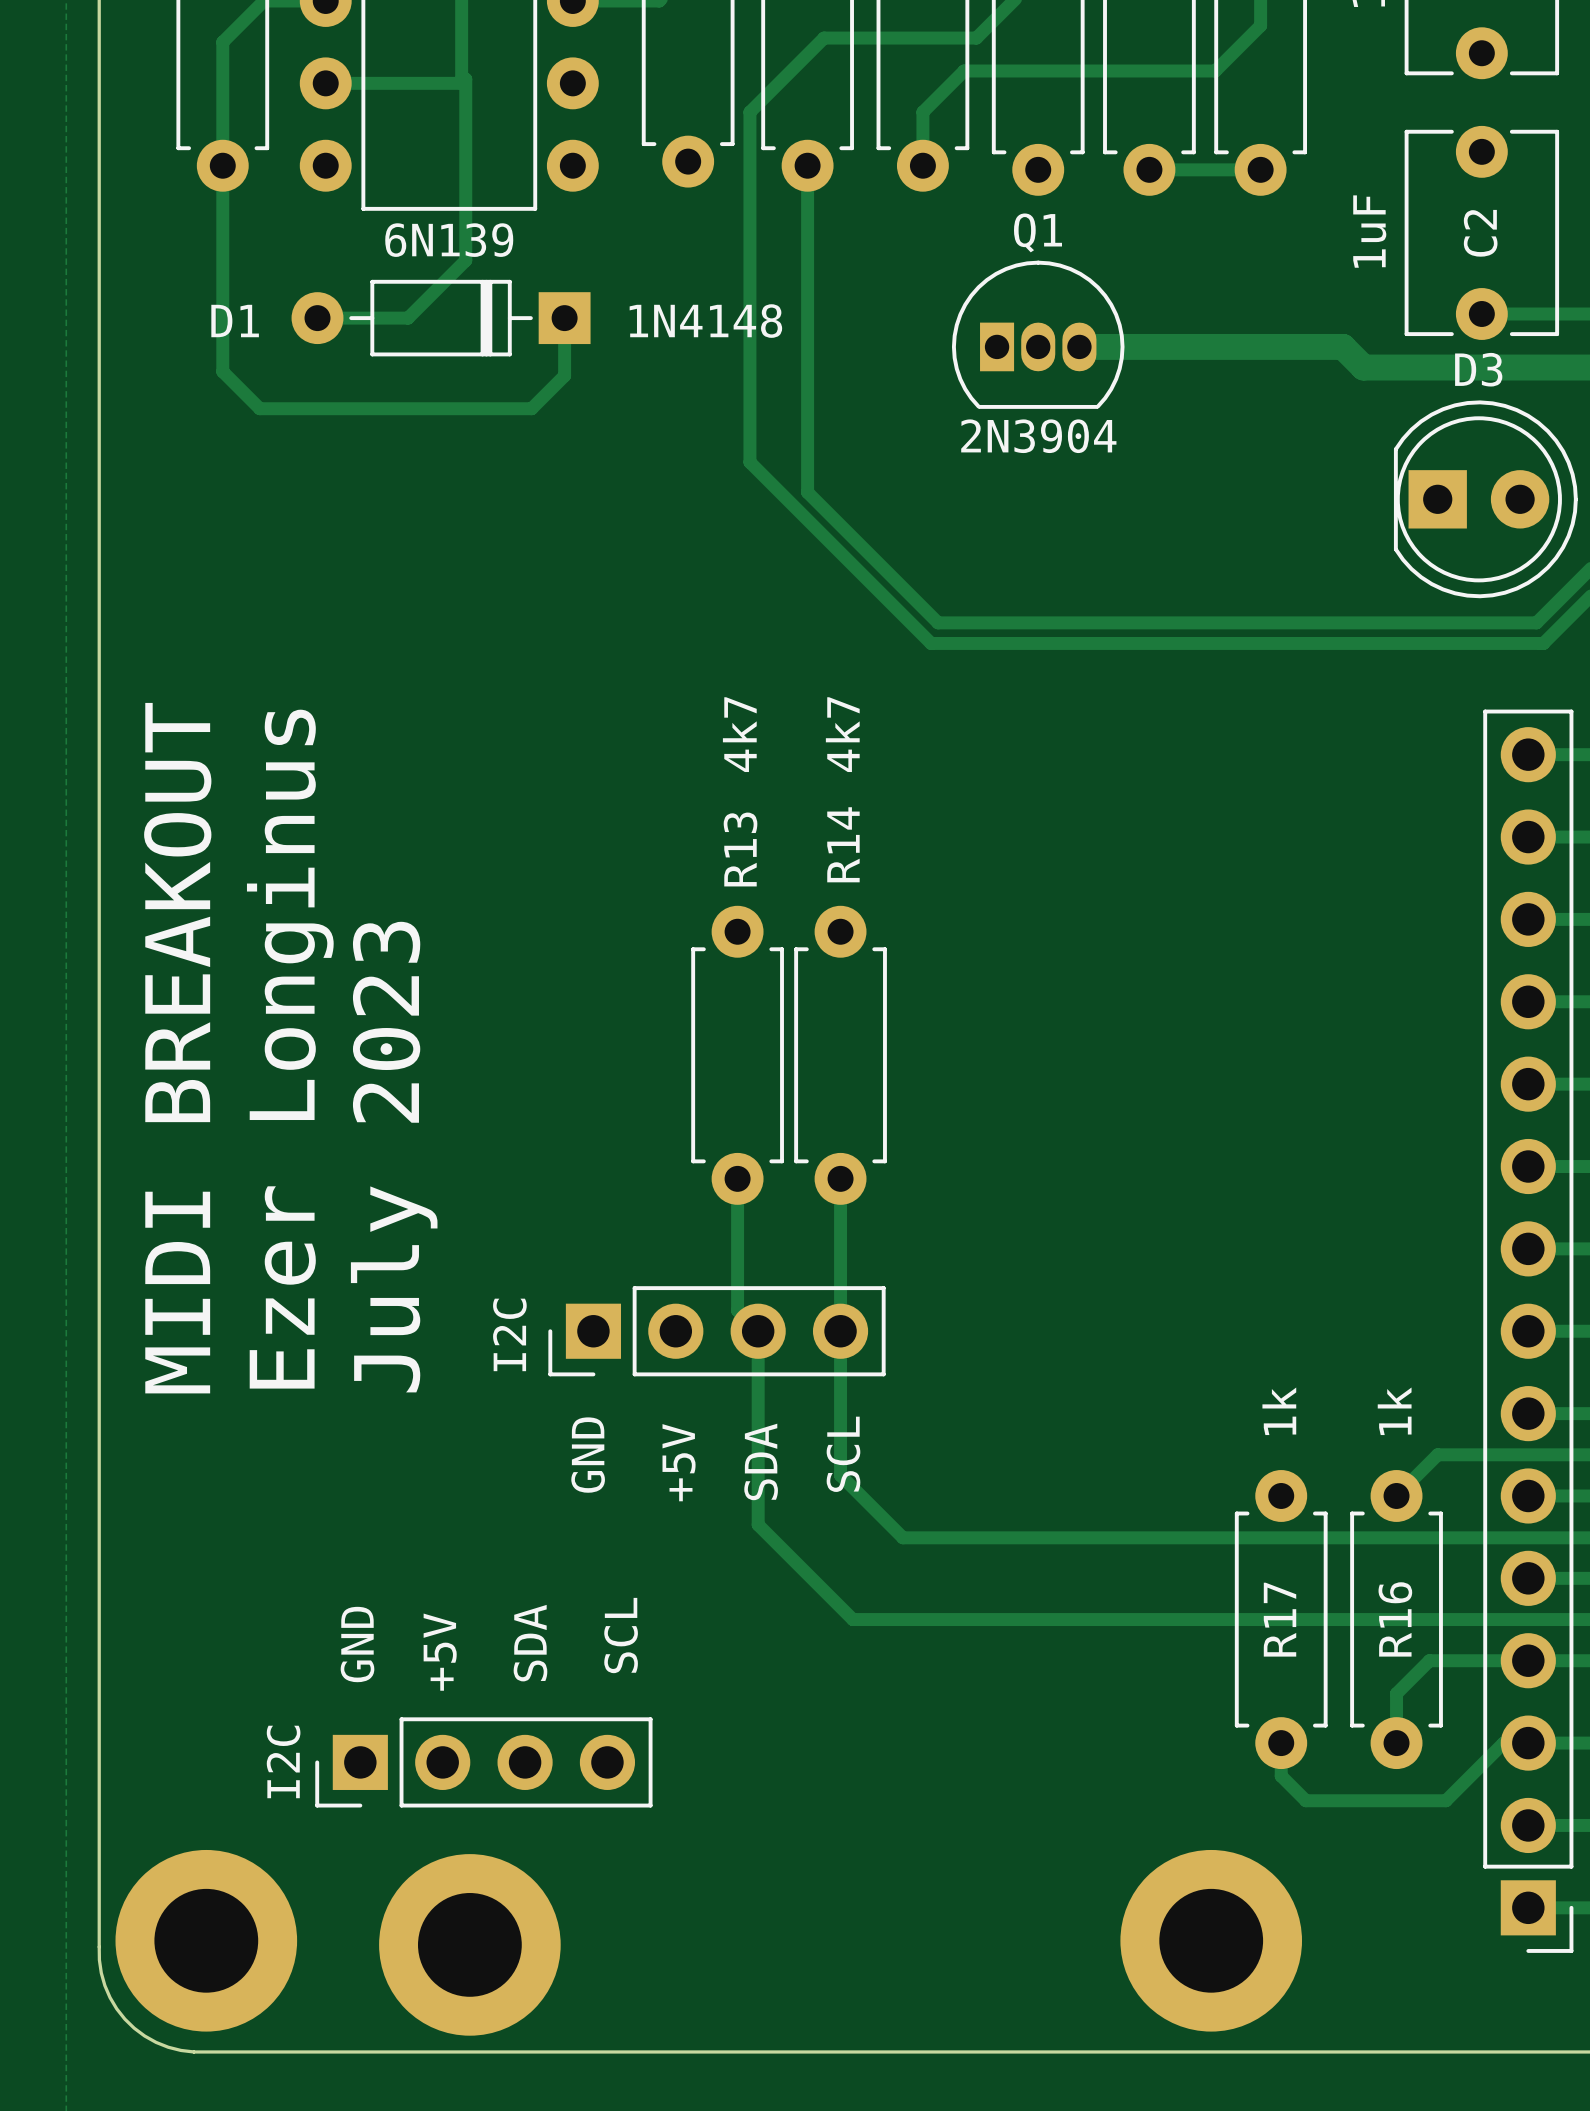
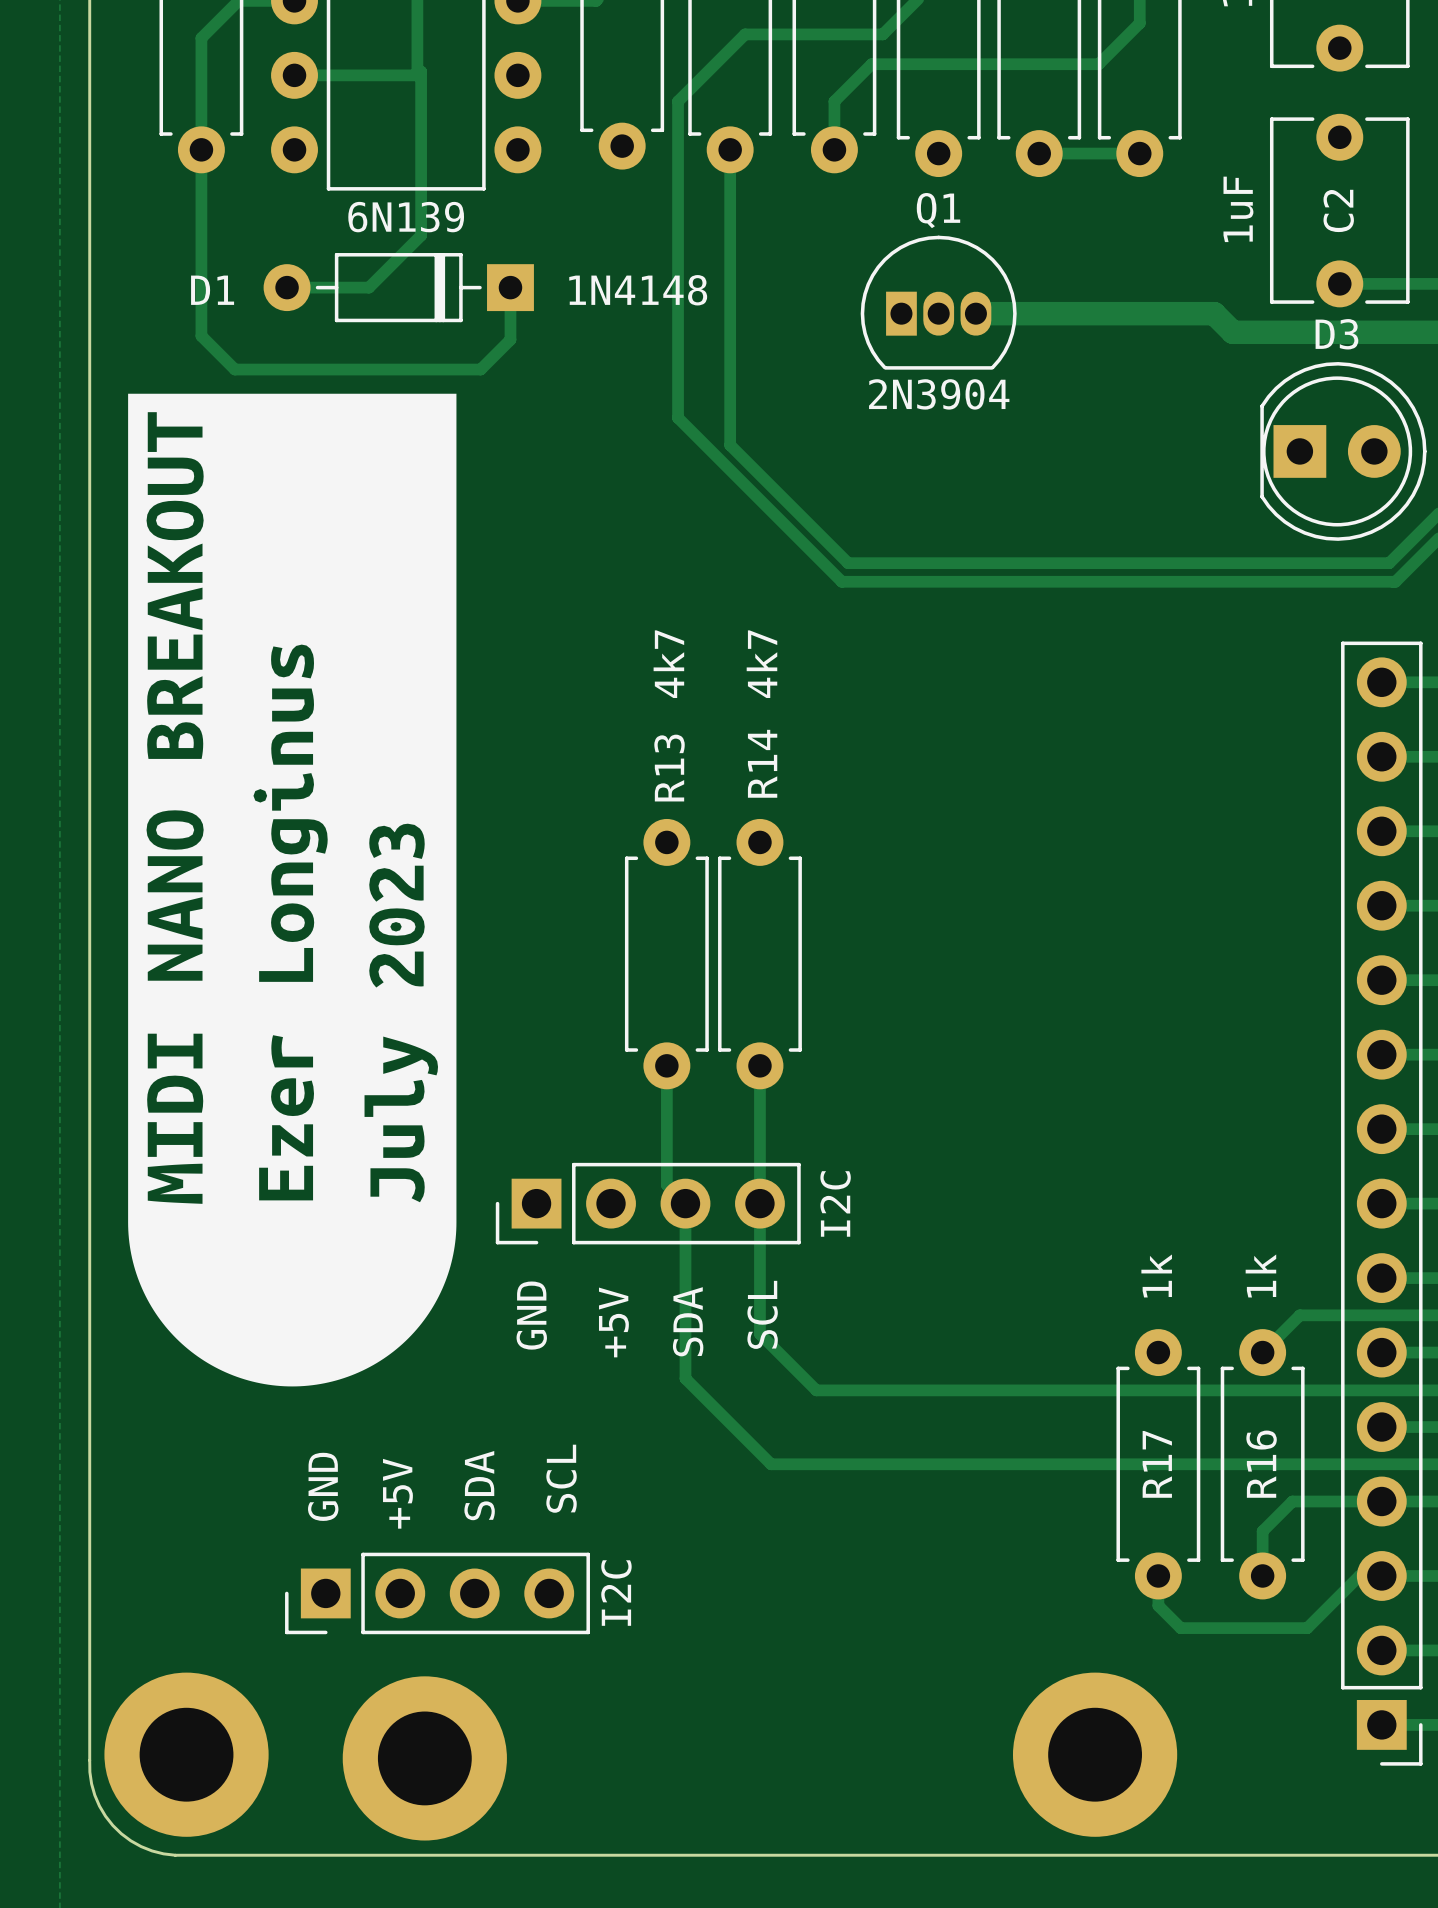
drawing: none -> [128, 393, 457, 1387]
text: MIDI BREAKOUT (177, 1048) -> none
text: Ezer Longinus (290, 1049) -> none
text: July 2023 (394, 1157) -> none
part value position: I2C (509, 1334) -> I2C (835, 1203)
I2C name: I2C (283, 1761) -> none
I2C value: none -> I2C (616, 1593)

